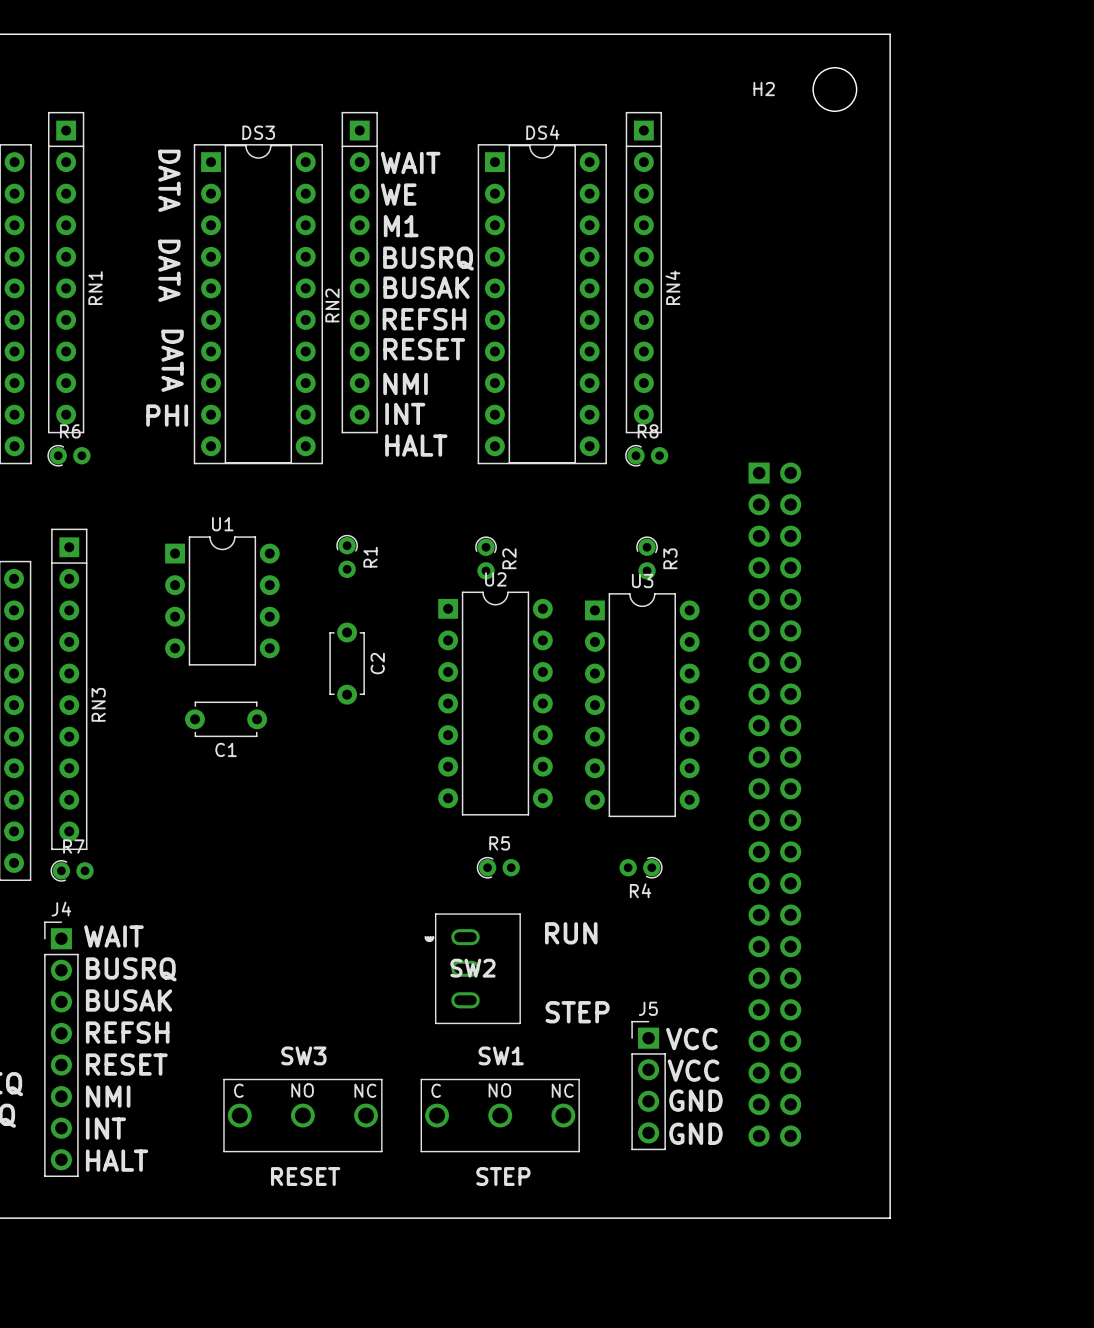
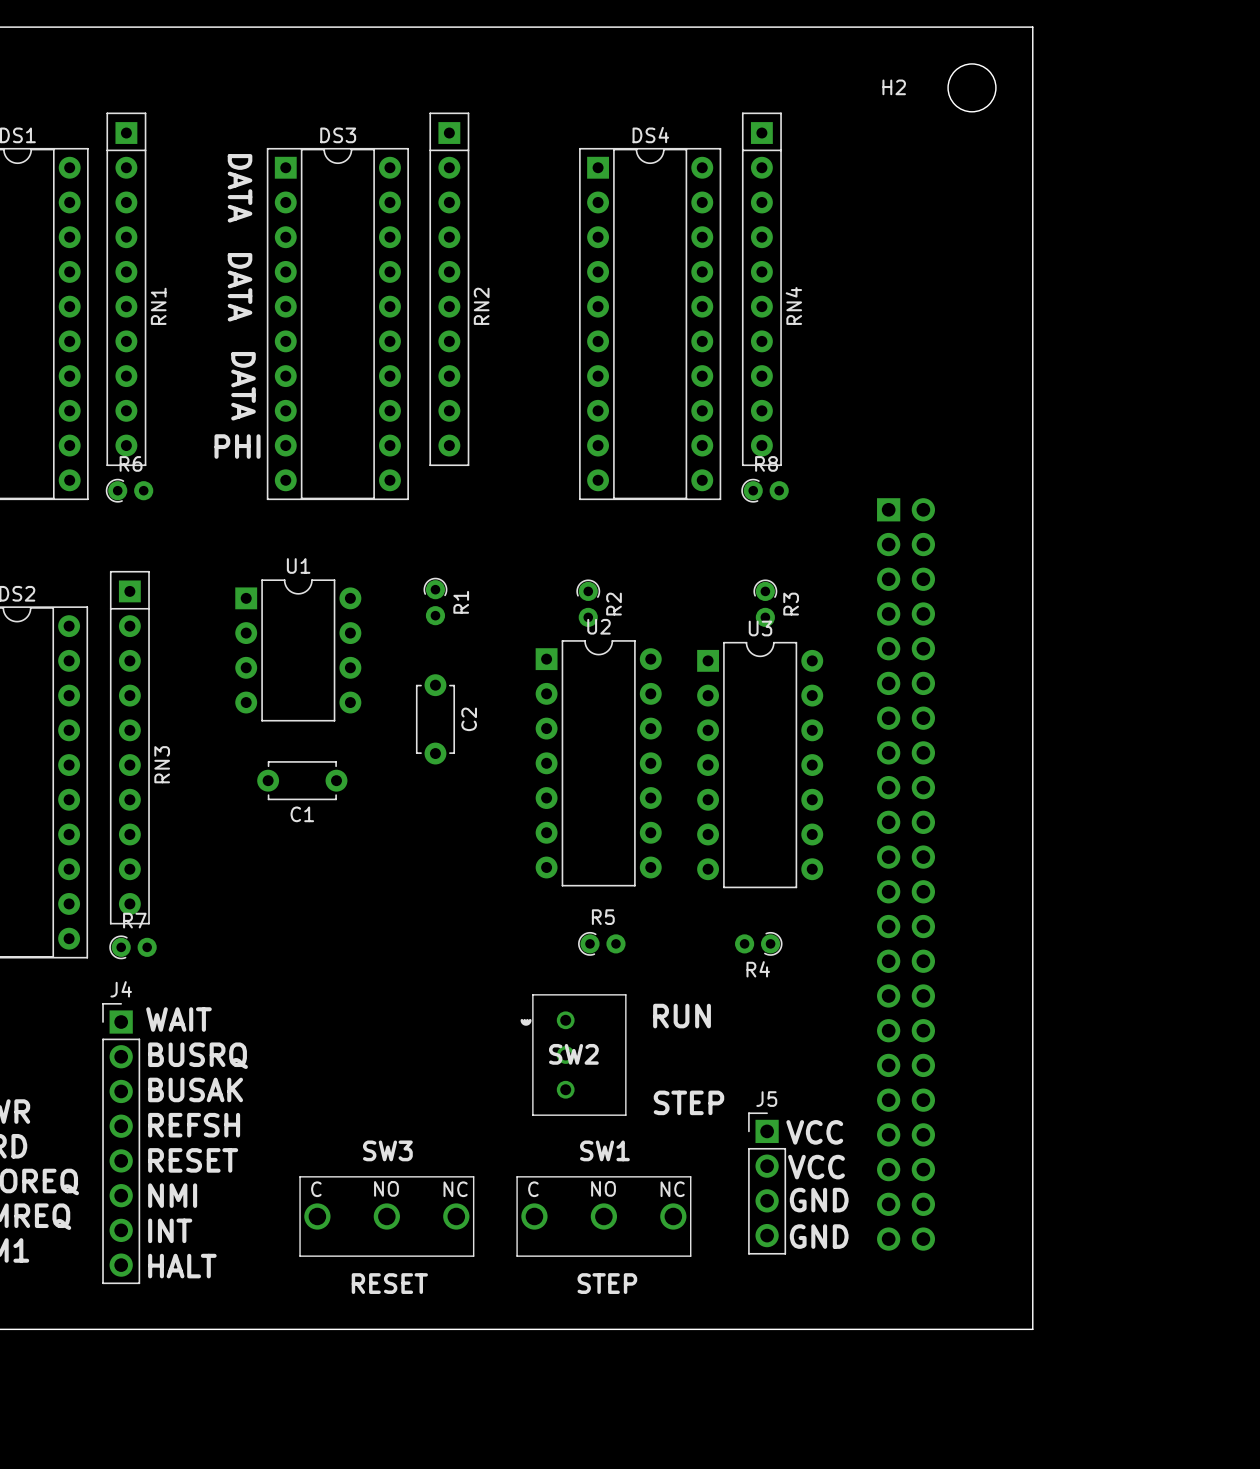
text: WAIT (410, 162) -> none
text: WE (398, 194) -> none
text: M1 (401, 226) -> none
text: BUSRQ (428, 258) -> none
text: BUSAK (426, 287) -> none
RN2 name position: RN2 (332, 305) -> RN2 (481, 306)
text: REFSH (424, 319) -> none
text: RESET (424, 349) -> none
text: NMI (405, 383) -> none
text: INT (405, 413) -> none
text: HALT (416, 445) -> none
SW2 footprint: [424, 913, 521, 1025] -> [520, 994, 627, 1116]

